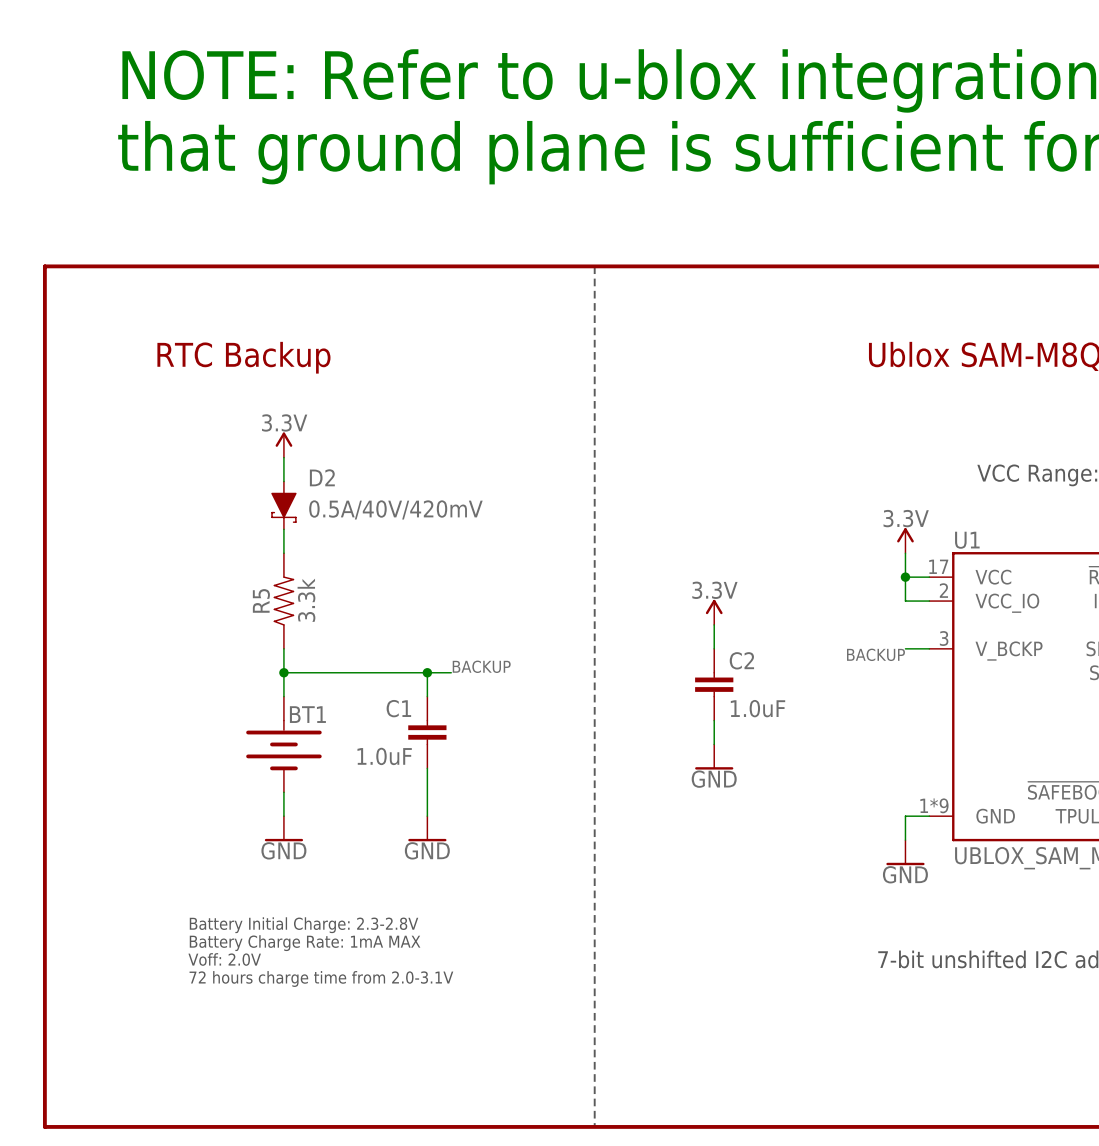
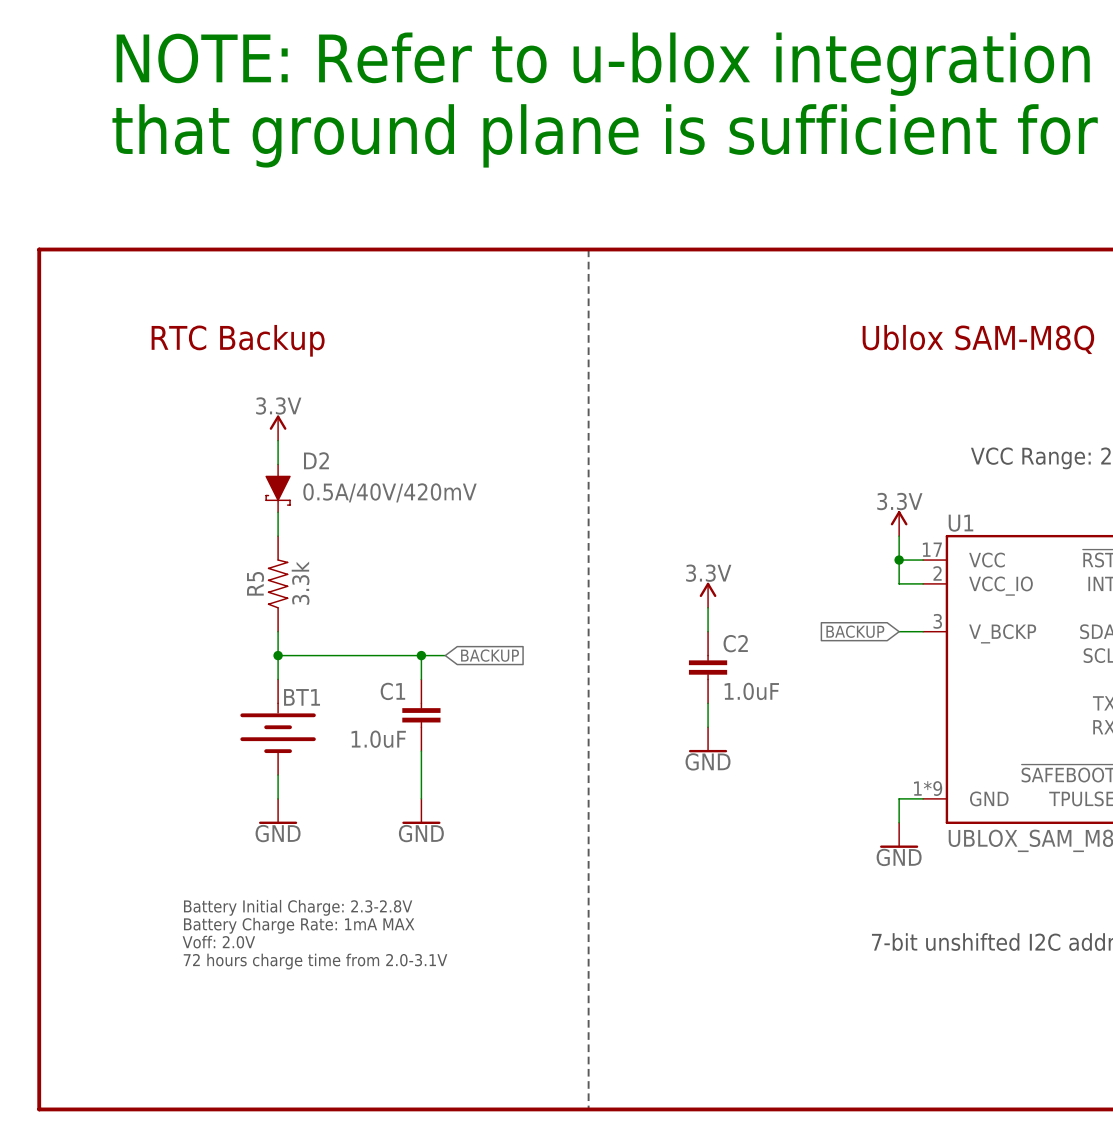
global label: none -> BACKUP (855, 631)
label: BACKUP (875, 654) -> none
label: BACKUP (481, 666) -> none
global label: none -> BACKUP (490, 655)

